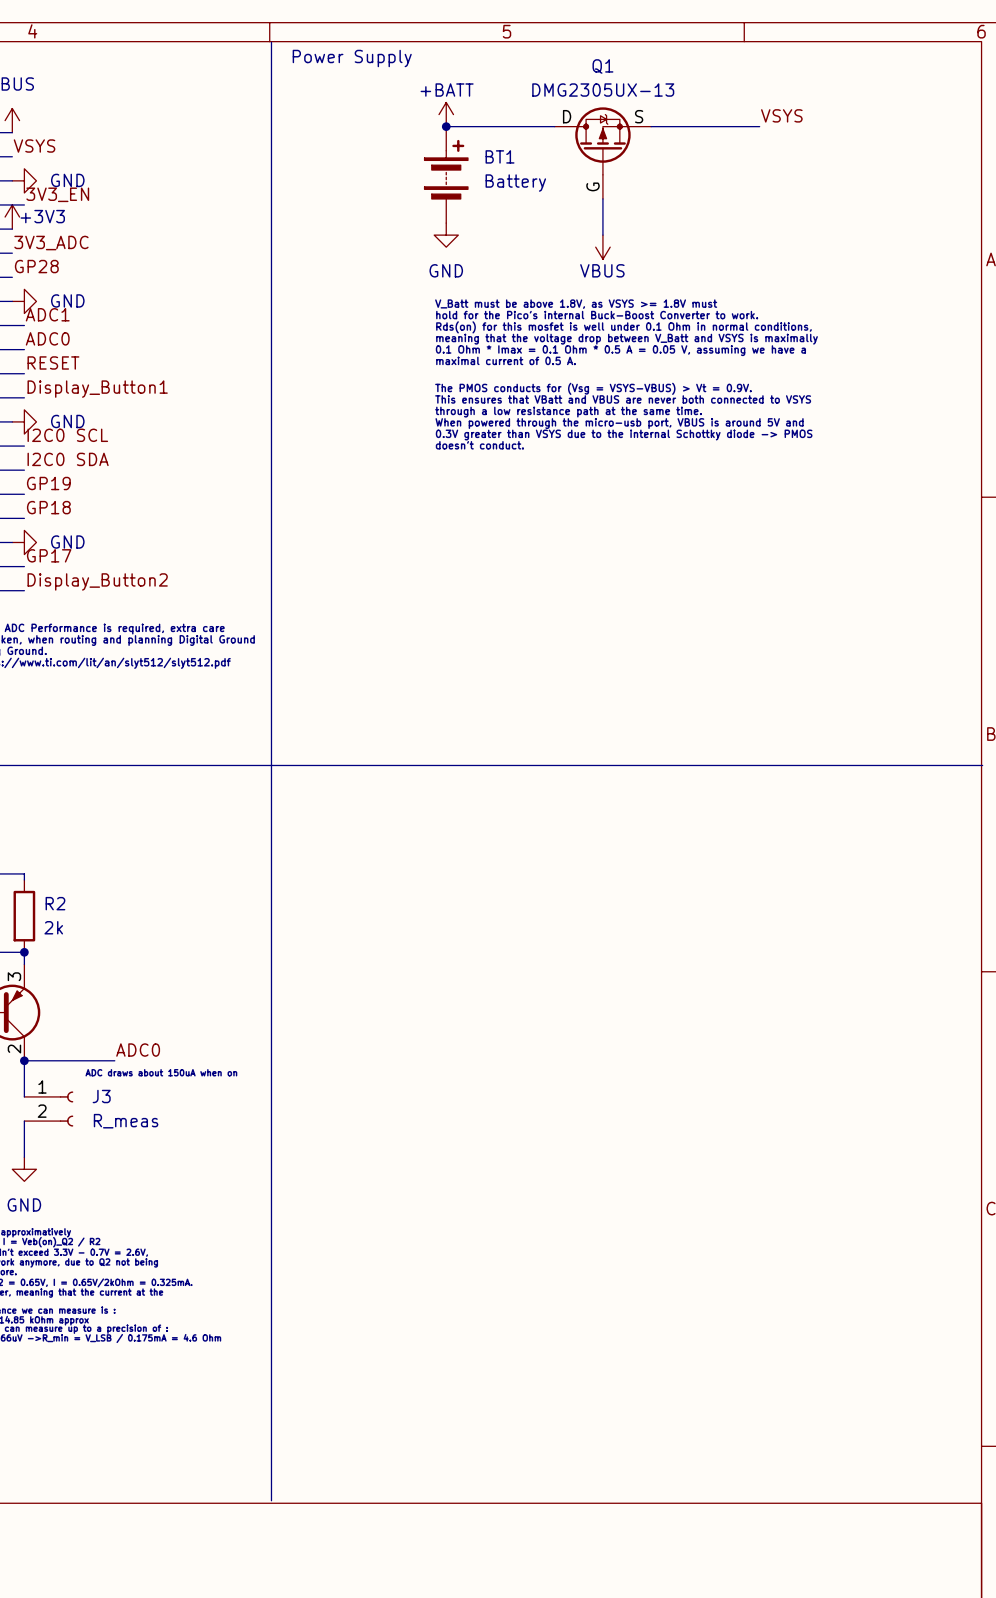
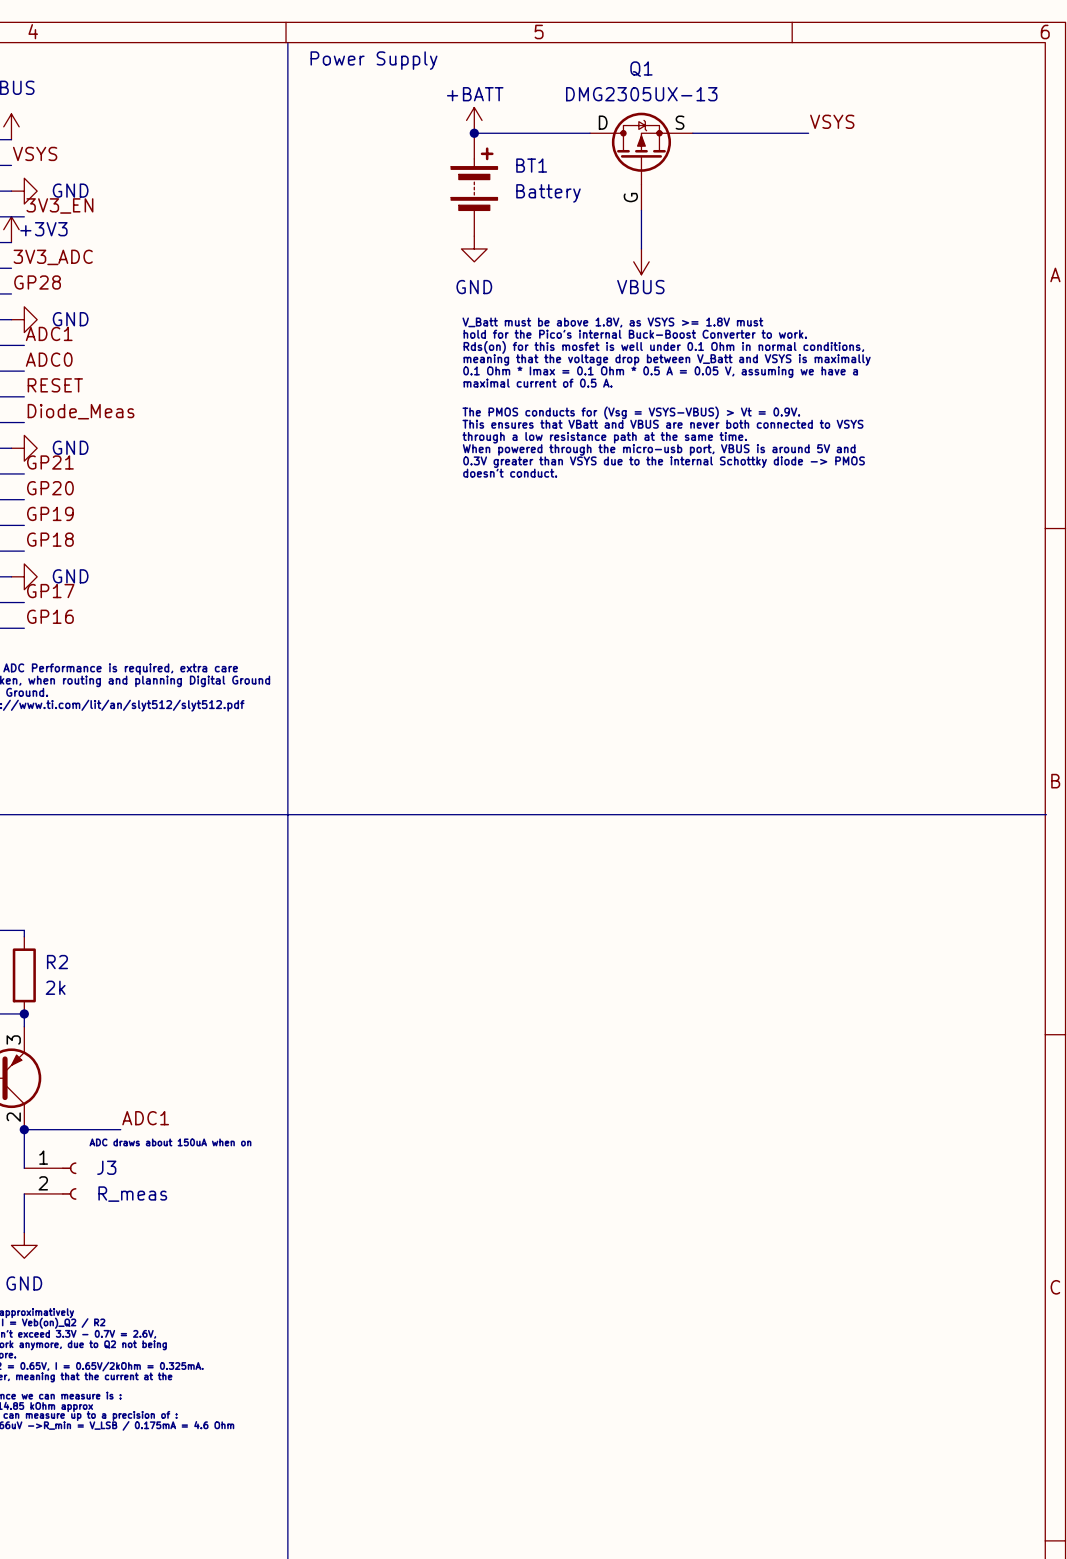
label: Display_Button1 (97, 389) -> Diode_Meas (81, 411)
label: I2C0 SCL (67, 435) -> GP21 (50, 462)
label: I2C0 SDA (68, 459) -> GP20 (50, 488)
label: Display_Button2 (97, 581) -> GP16 (50, 616)
label: ADC0 (138, 1050) -> ADC1 (145, 1118)

